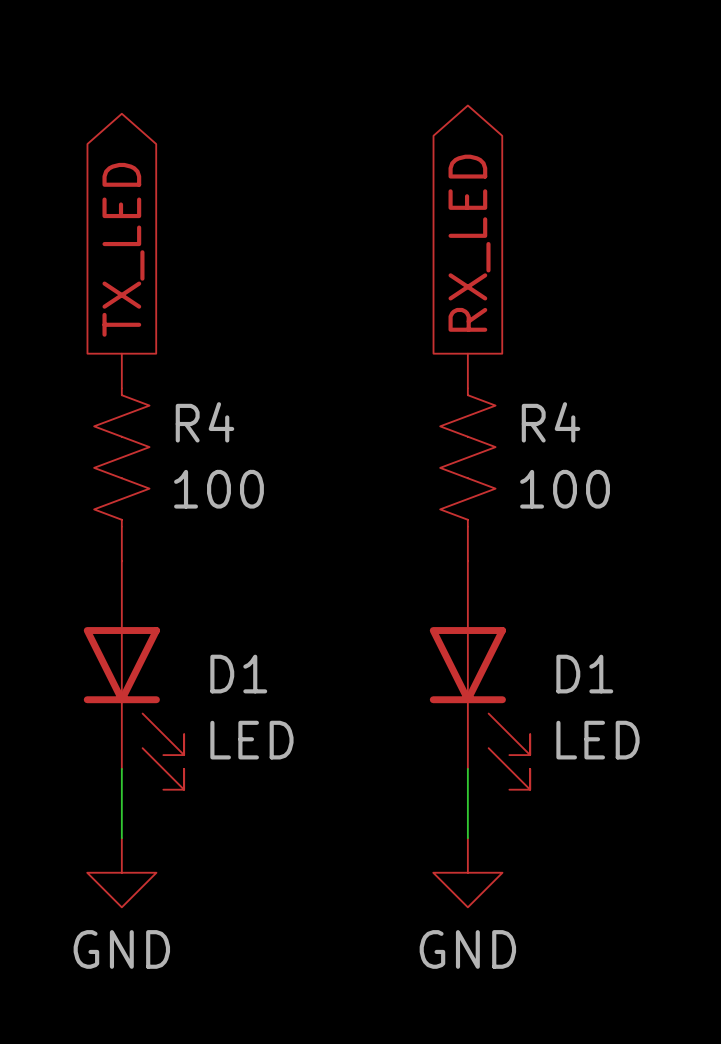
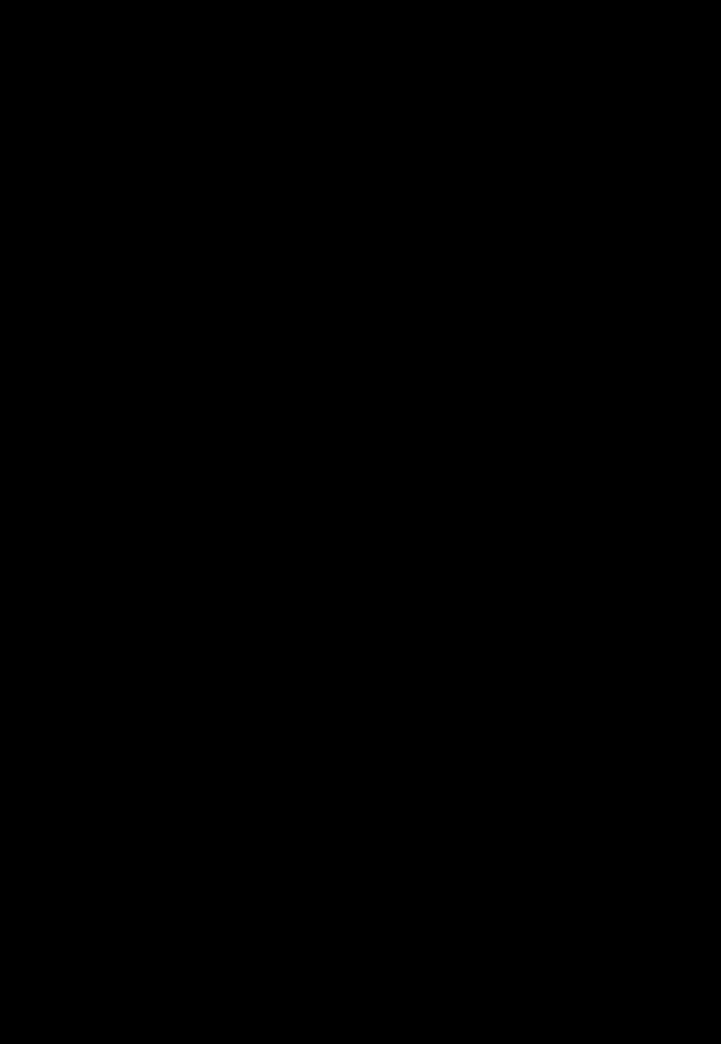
global label: RX_LED (469, 243) -> none
global label: TX_LED (123, 249) -> none
R4: 100 (121, 457) -> none
R4: 100 (467, 457) -> none
D1: LED (133, 675) -> none
D1: LED (479, 675) -> none
wire: (121, 768) (121, 838) -> none
wire: (467, 768) (467, 838) -> none
power symbol: GND (121, 872) -> none
power symbol: GND (467, 872) -> none

